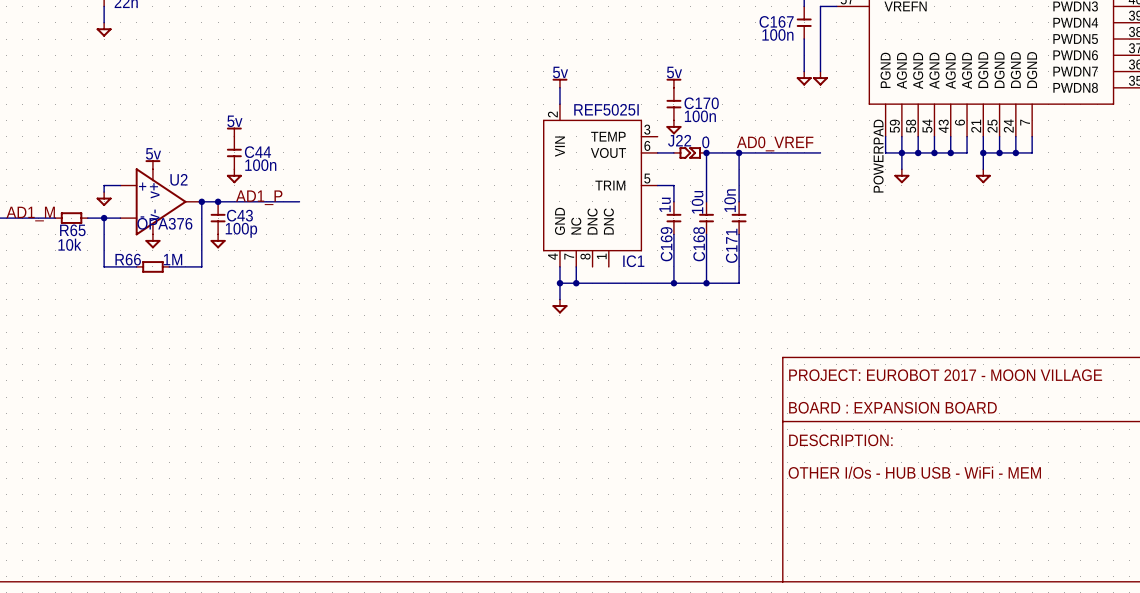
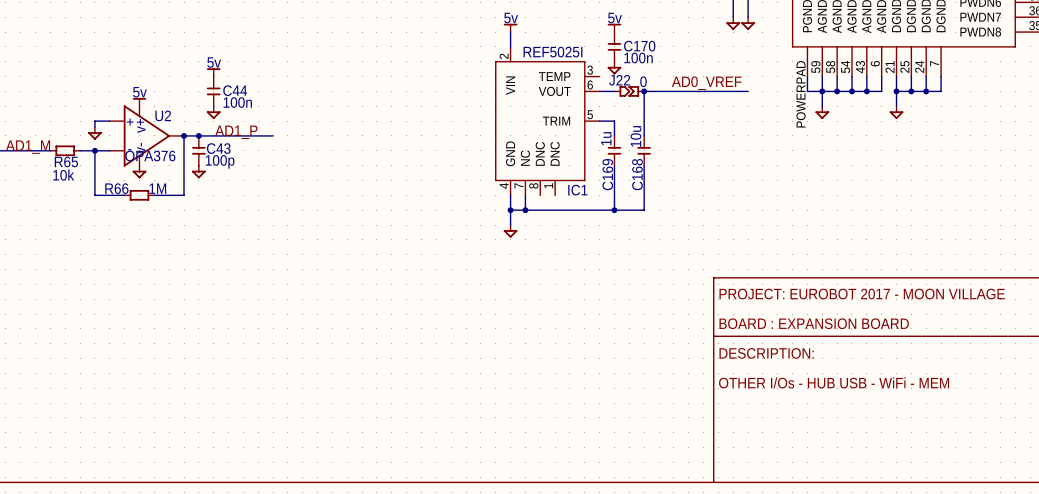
wire: (739, 152) (739, 201) -> none
junction: (739, 152) -> none
C171: 10n (739, 218) -> none
wire: (739, 234) (739, 283) (706, 283) -> none
junction: (706, 283) -> none

